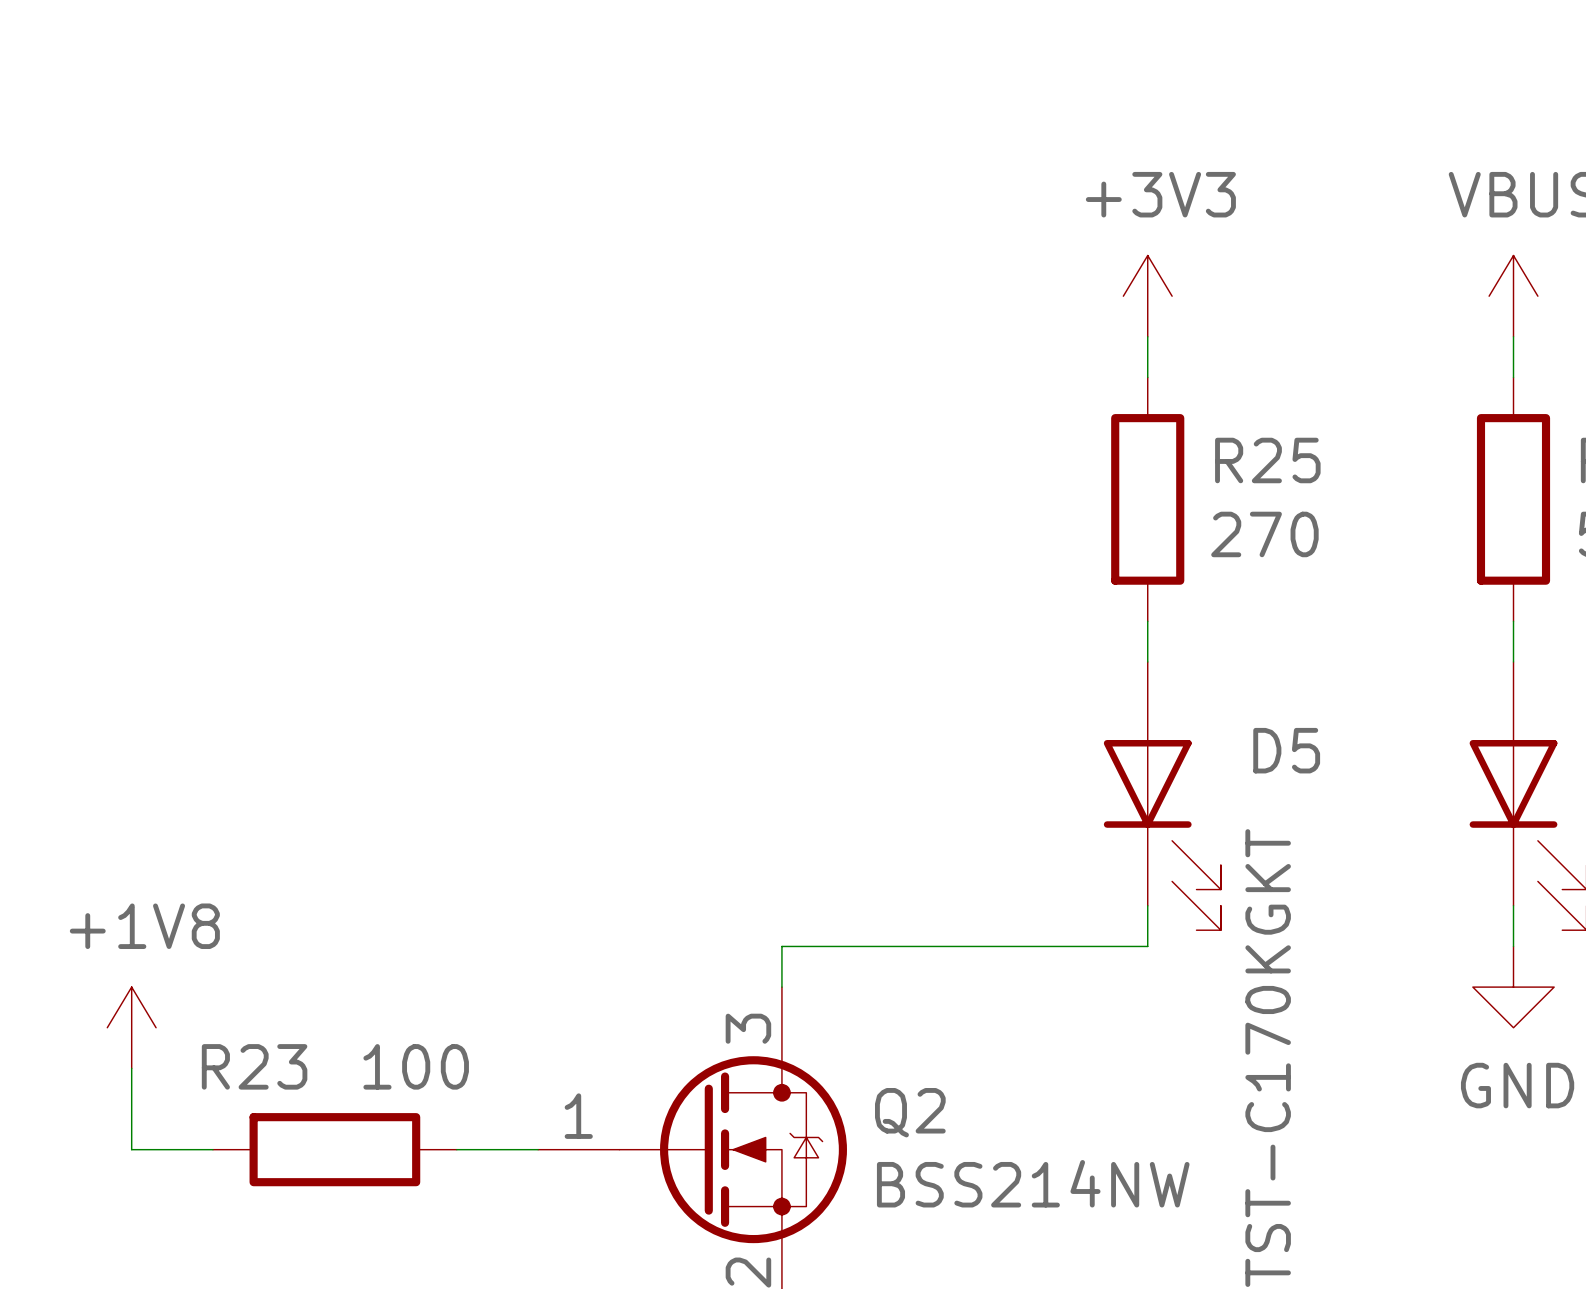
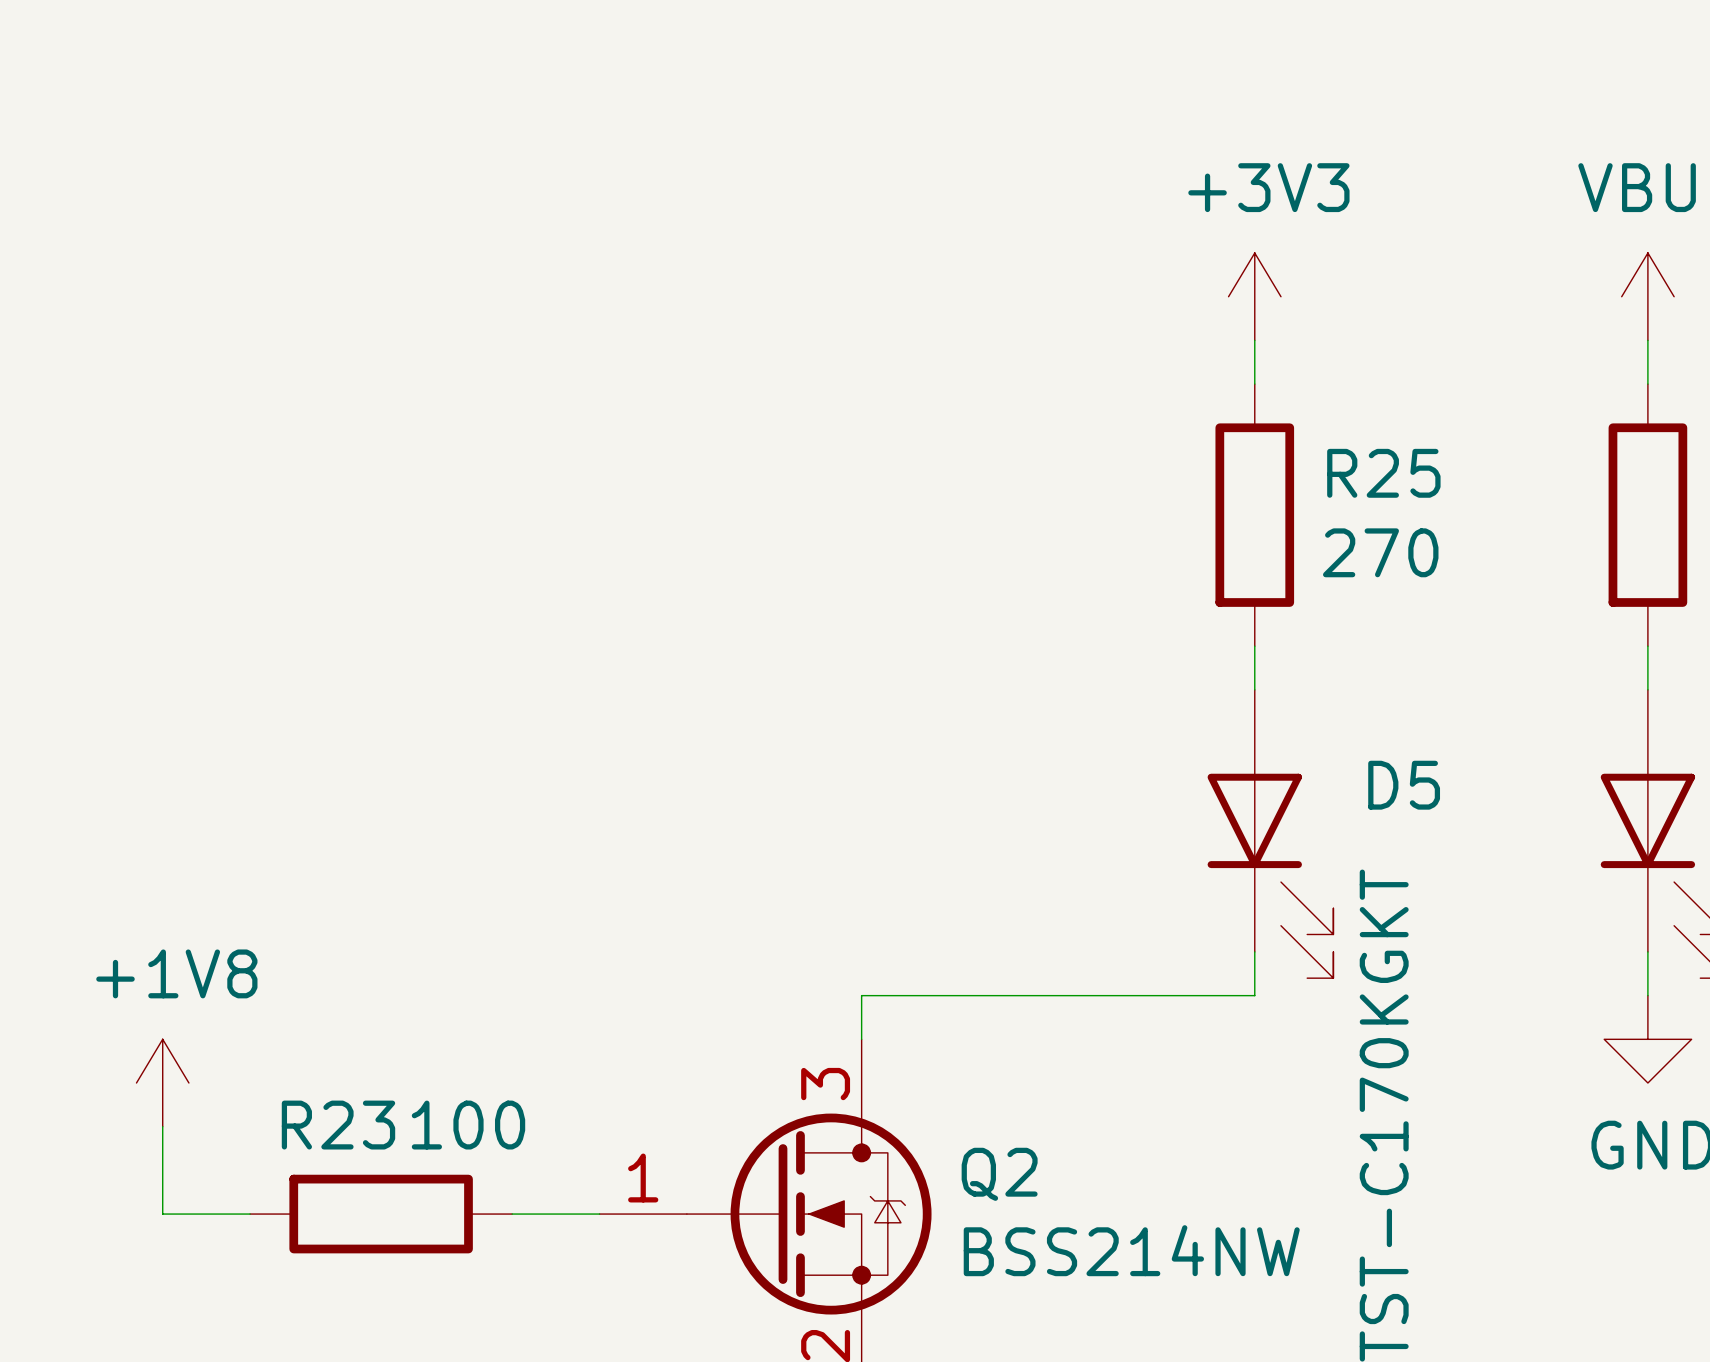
R23 name position: R23 (254, 1066) -> R23 (338, 1125)

